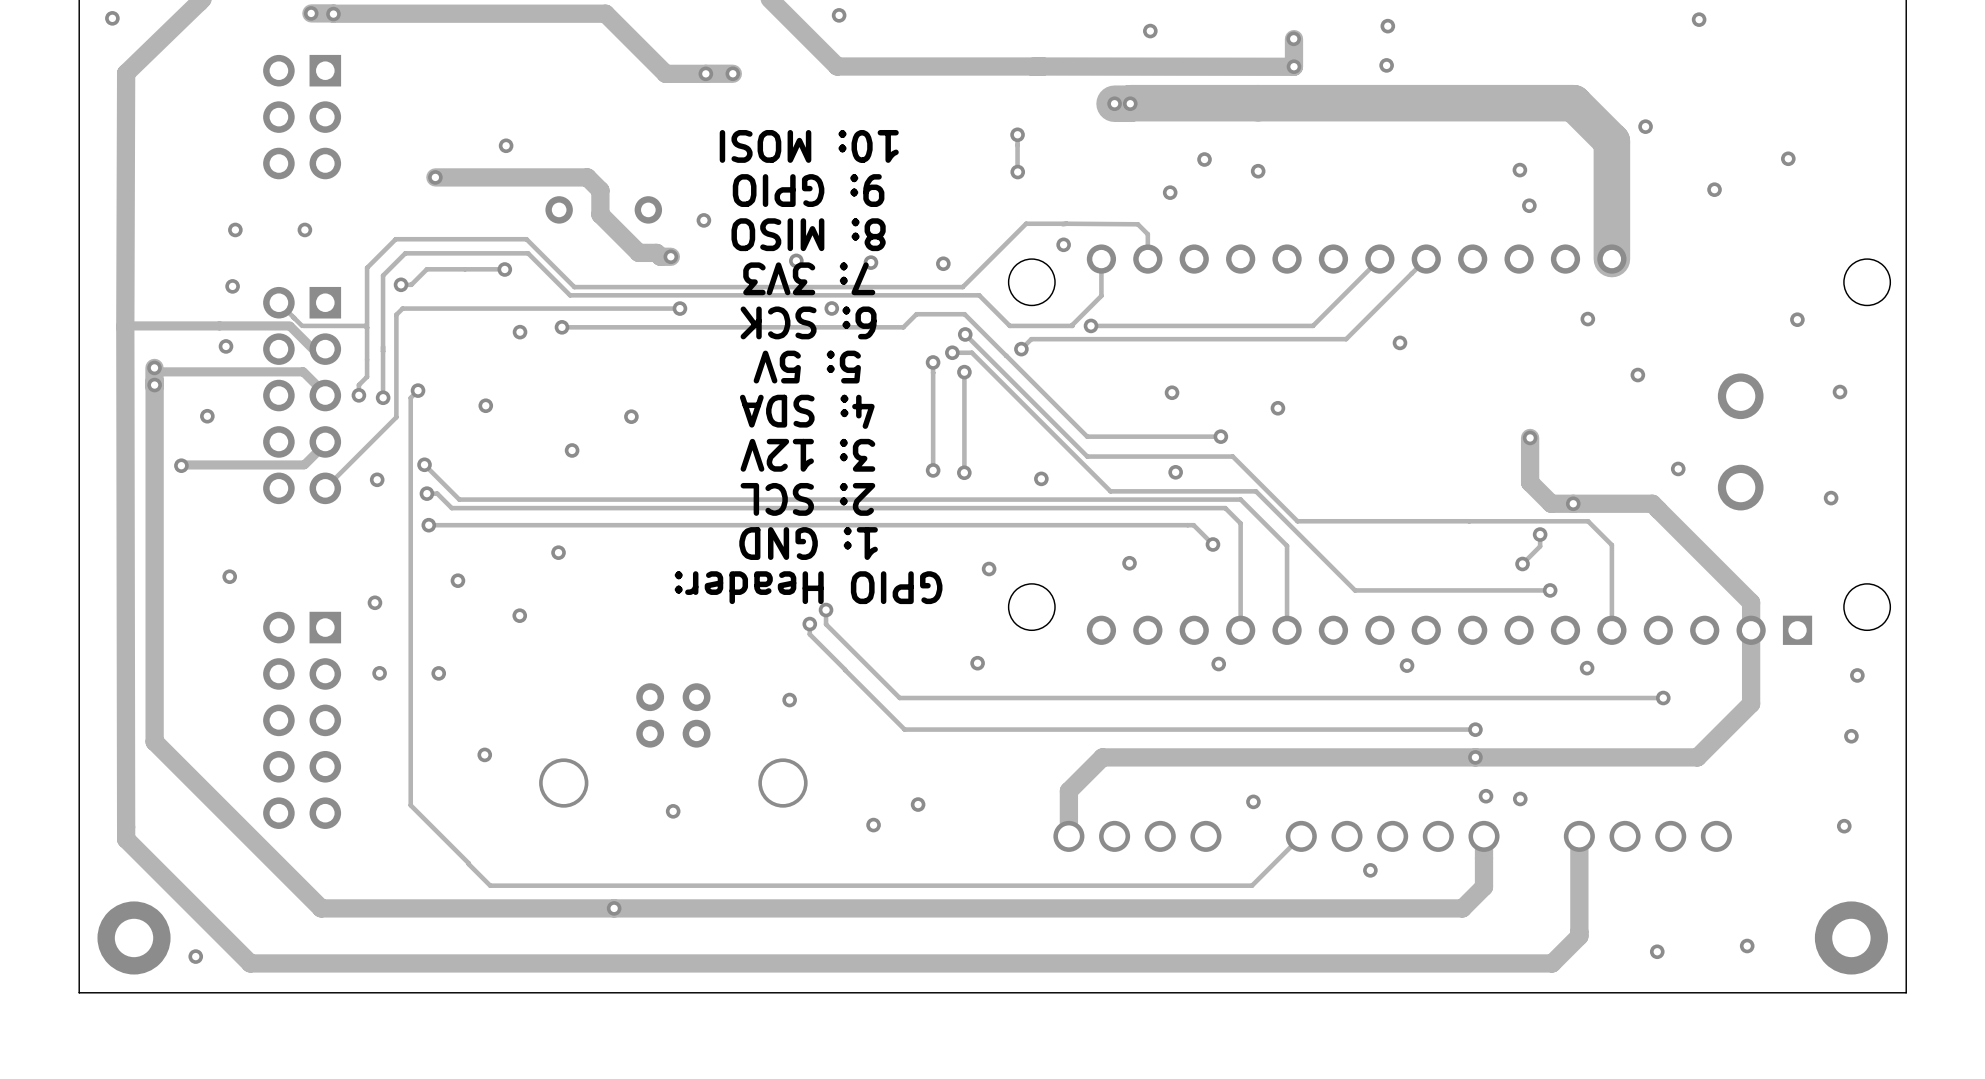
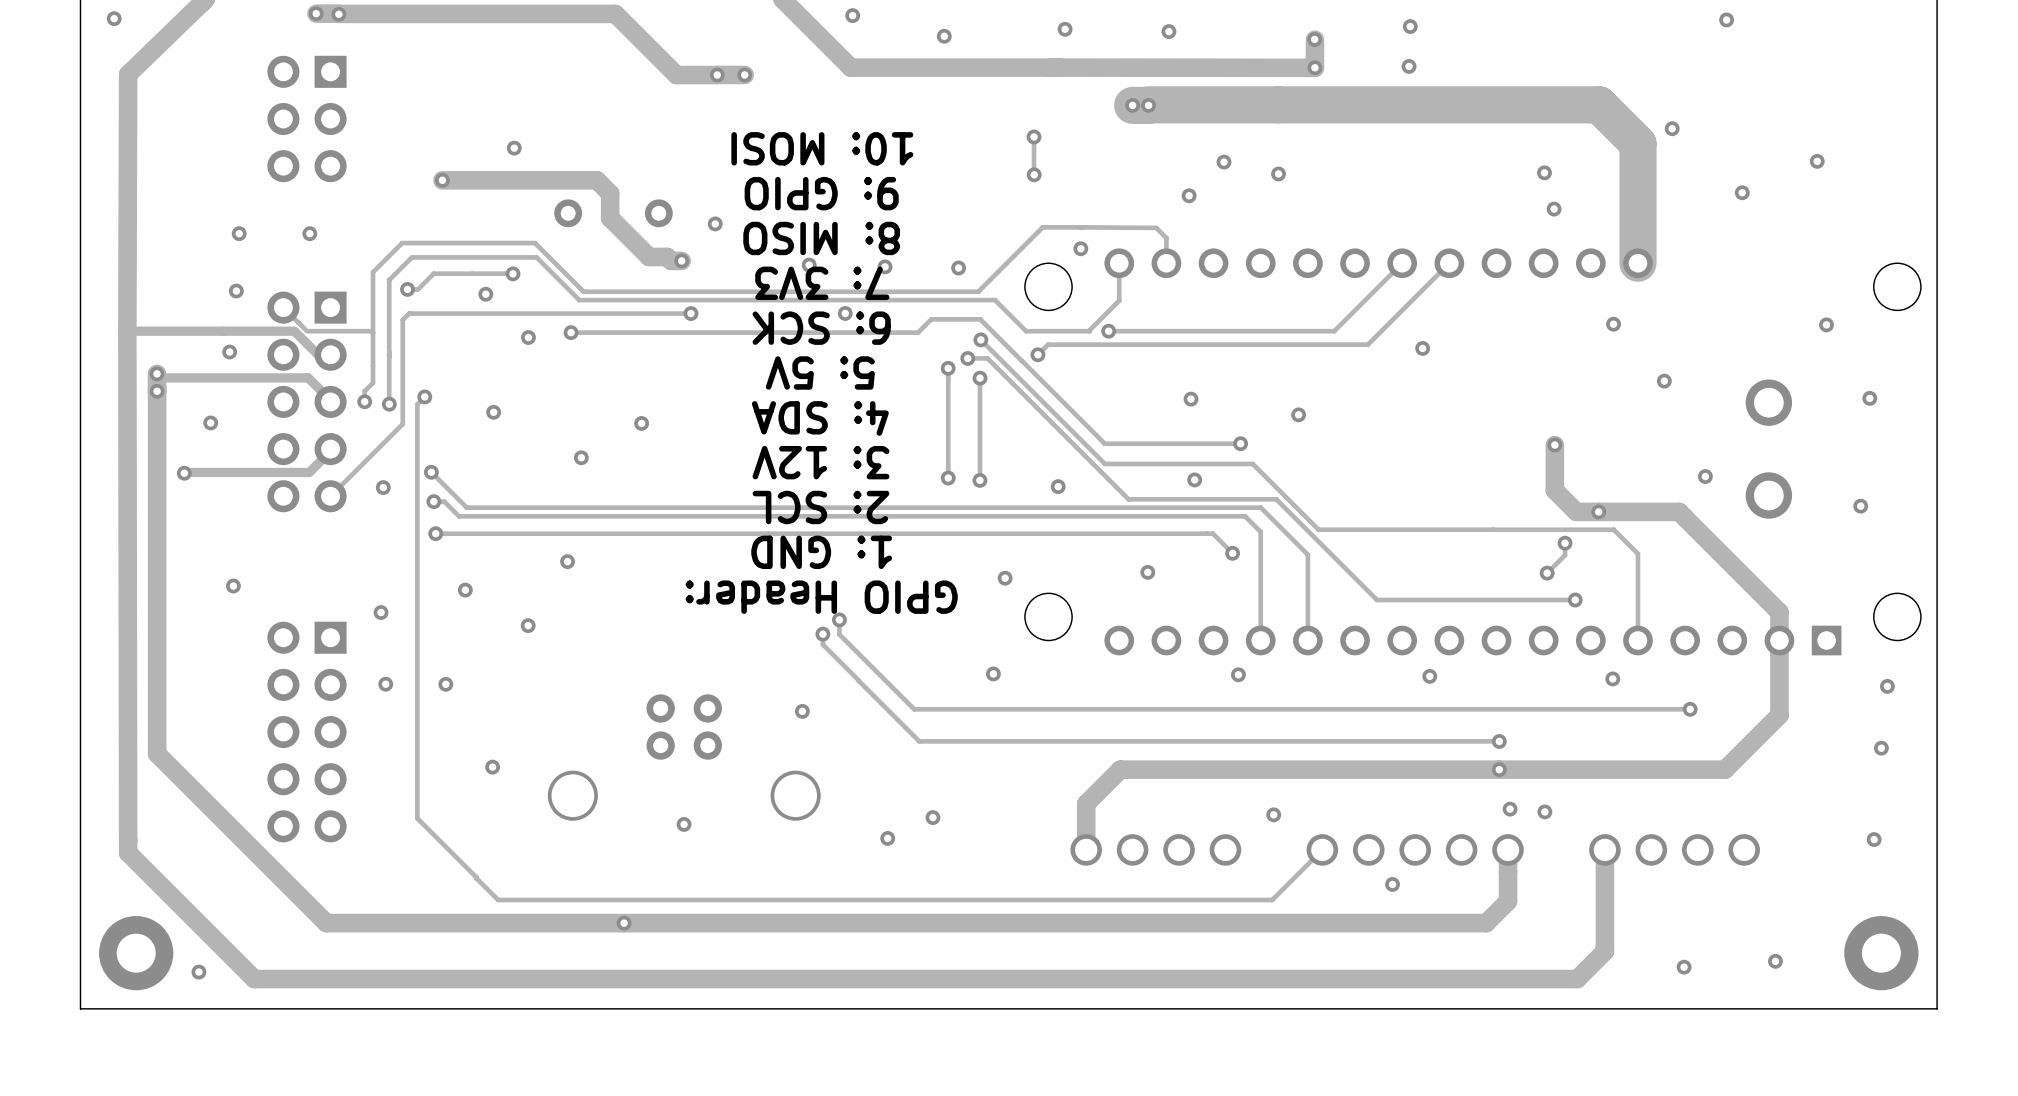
via: none -> (1065, 29)
via: none -> (944, 36)
via: none -> (485, 294)

